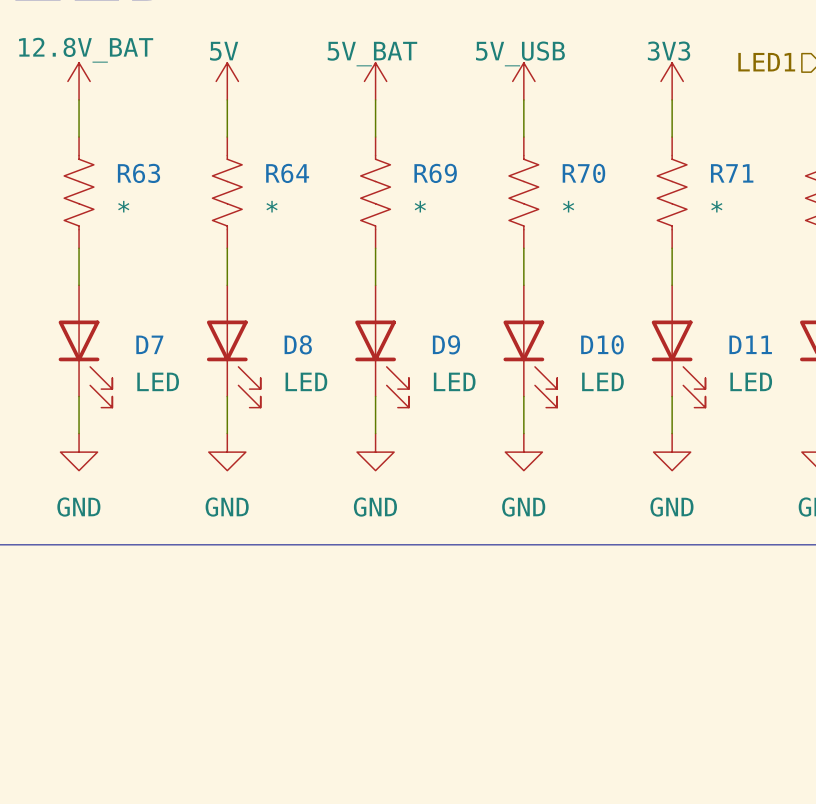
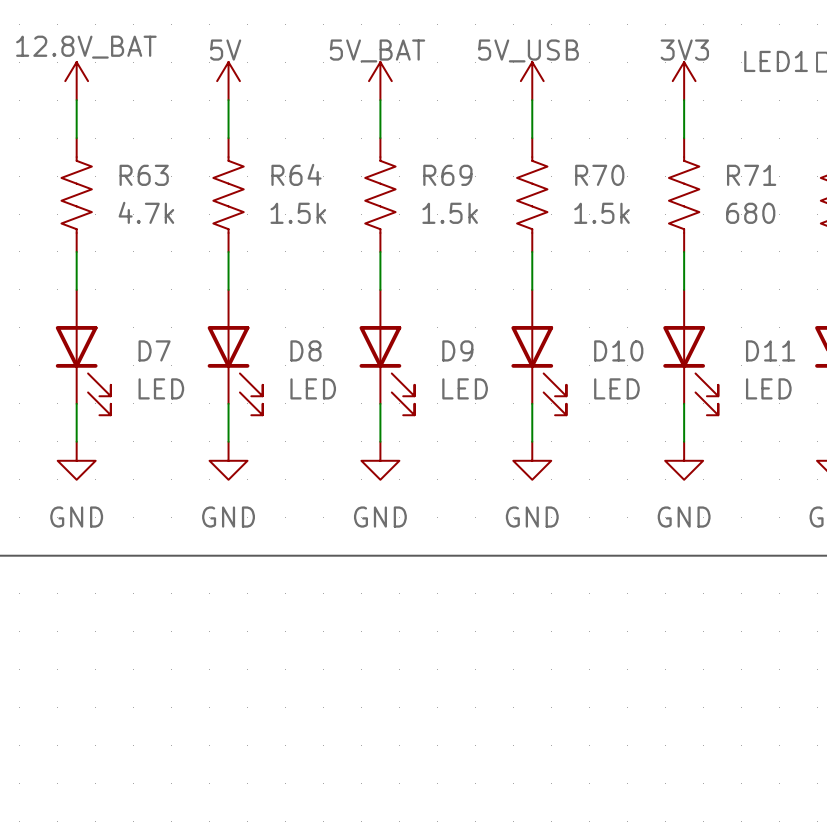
R63 value: * (123, 206) -> 4.7k (146, 212)
R64 value: * (272, 206) -> 1.5k (298, 213)
R69 value: * (420, 206) -> 1.5k (450, 213)
R70 value: * (568, 206) -> 1.5k (602, 213)
R71 value: * (716, 206) -> 680 (750, 213)

